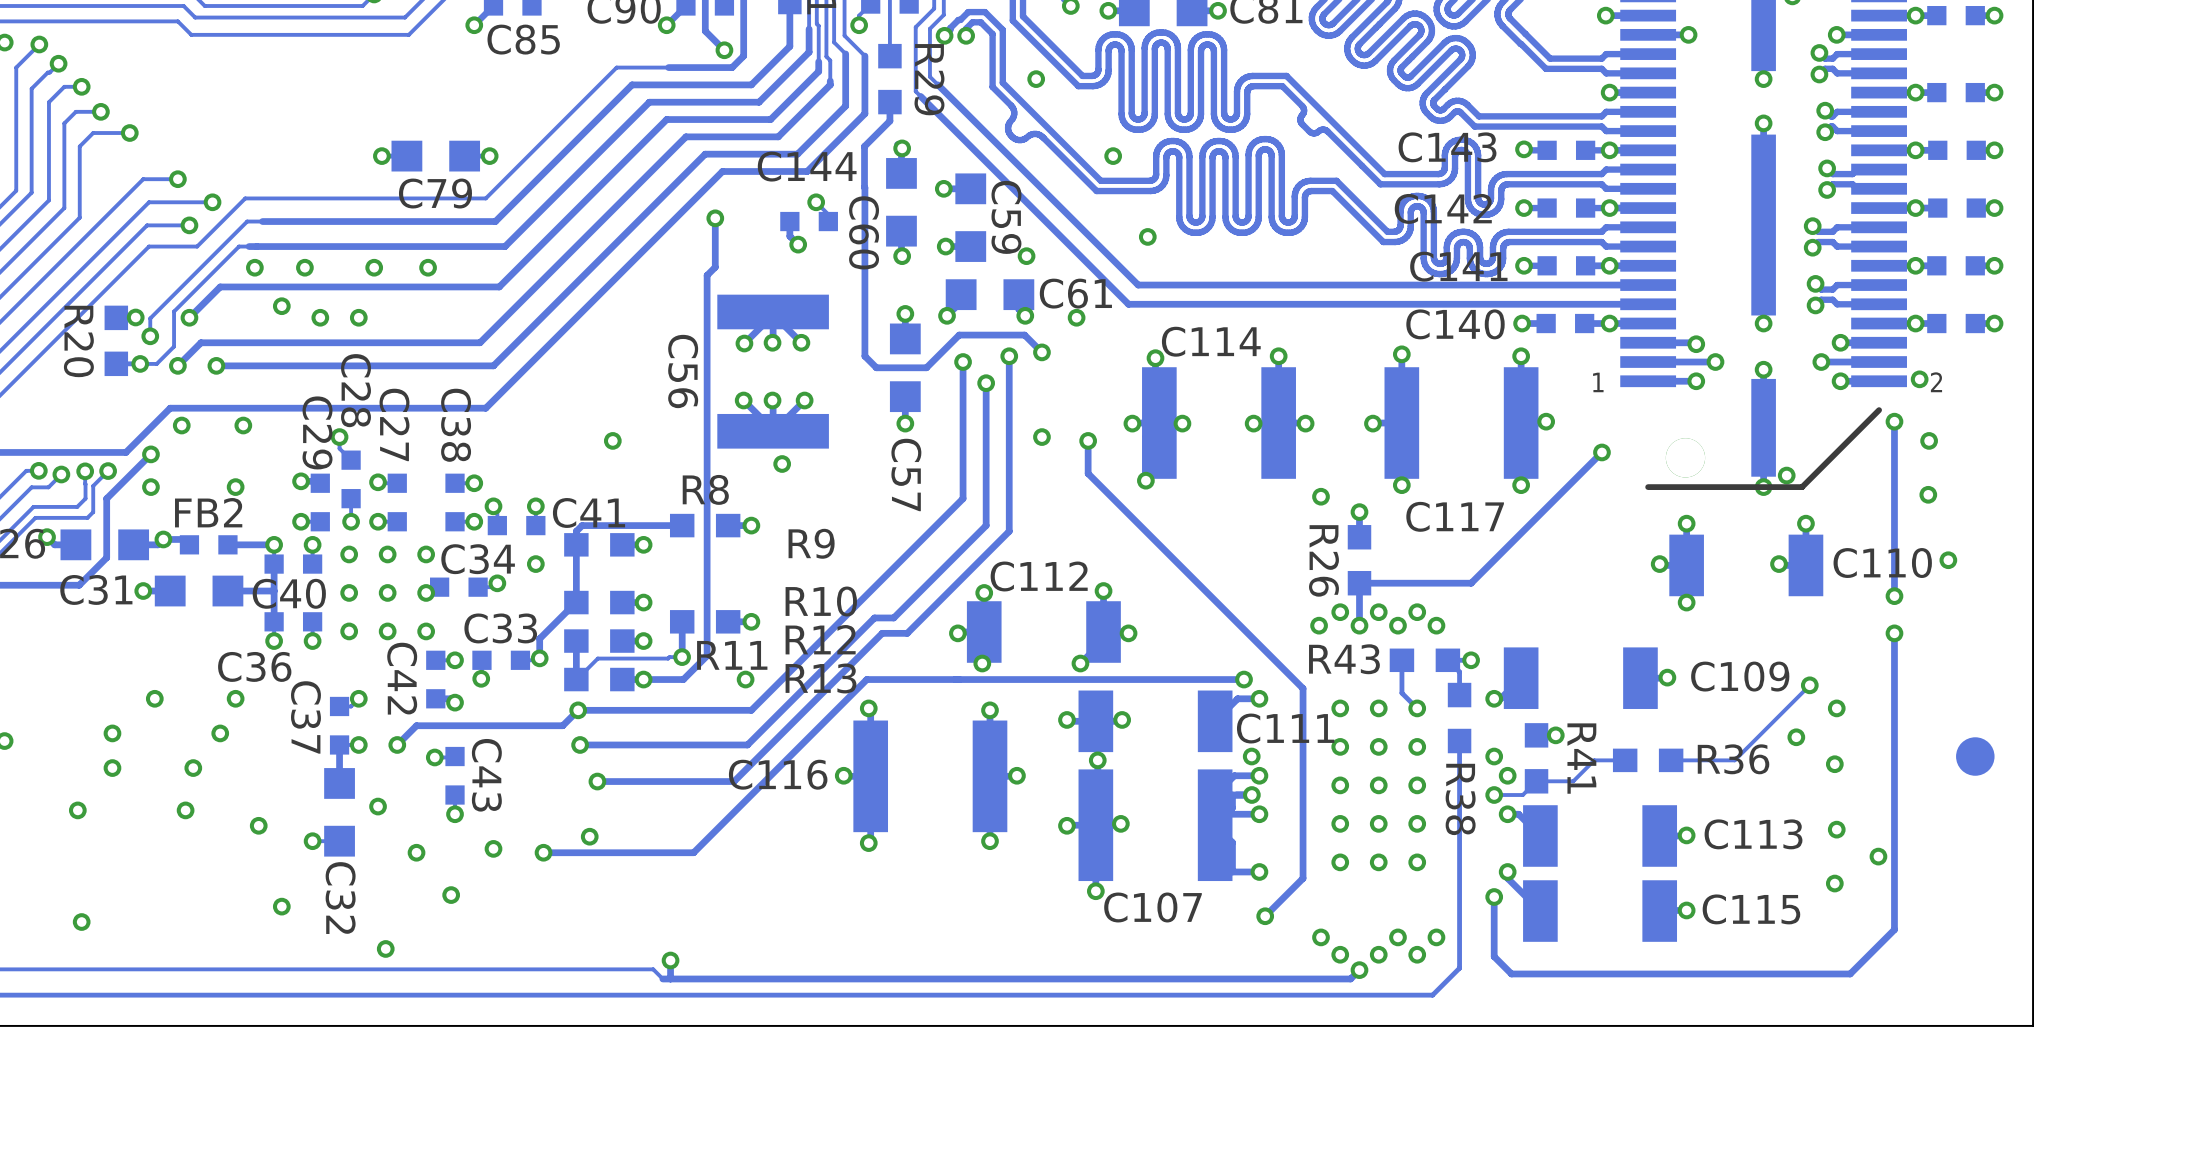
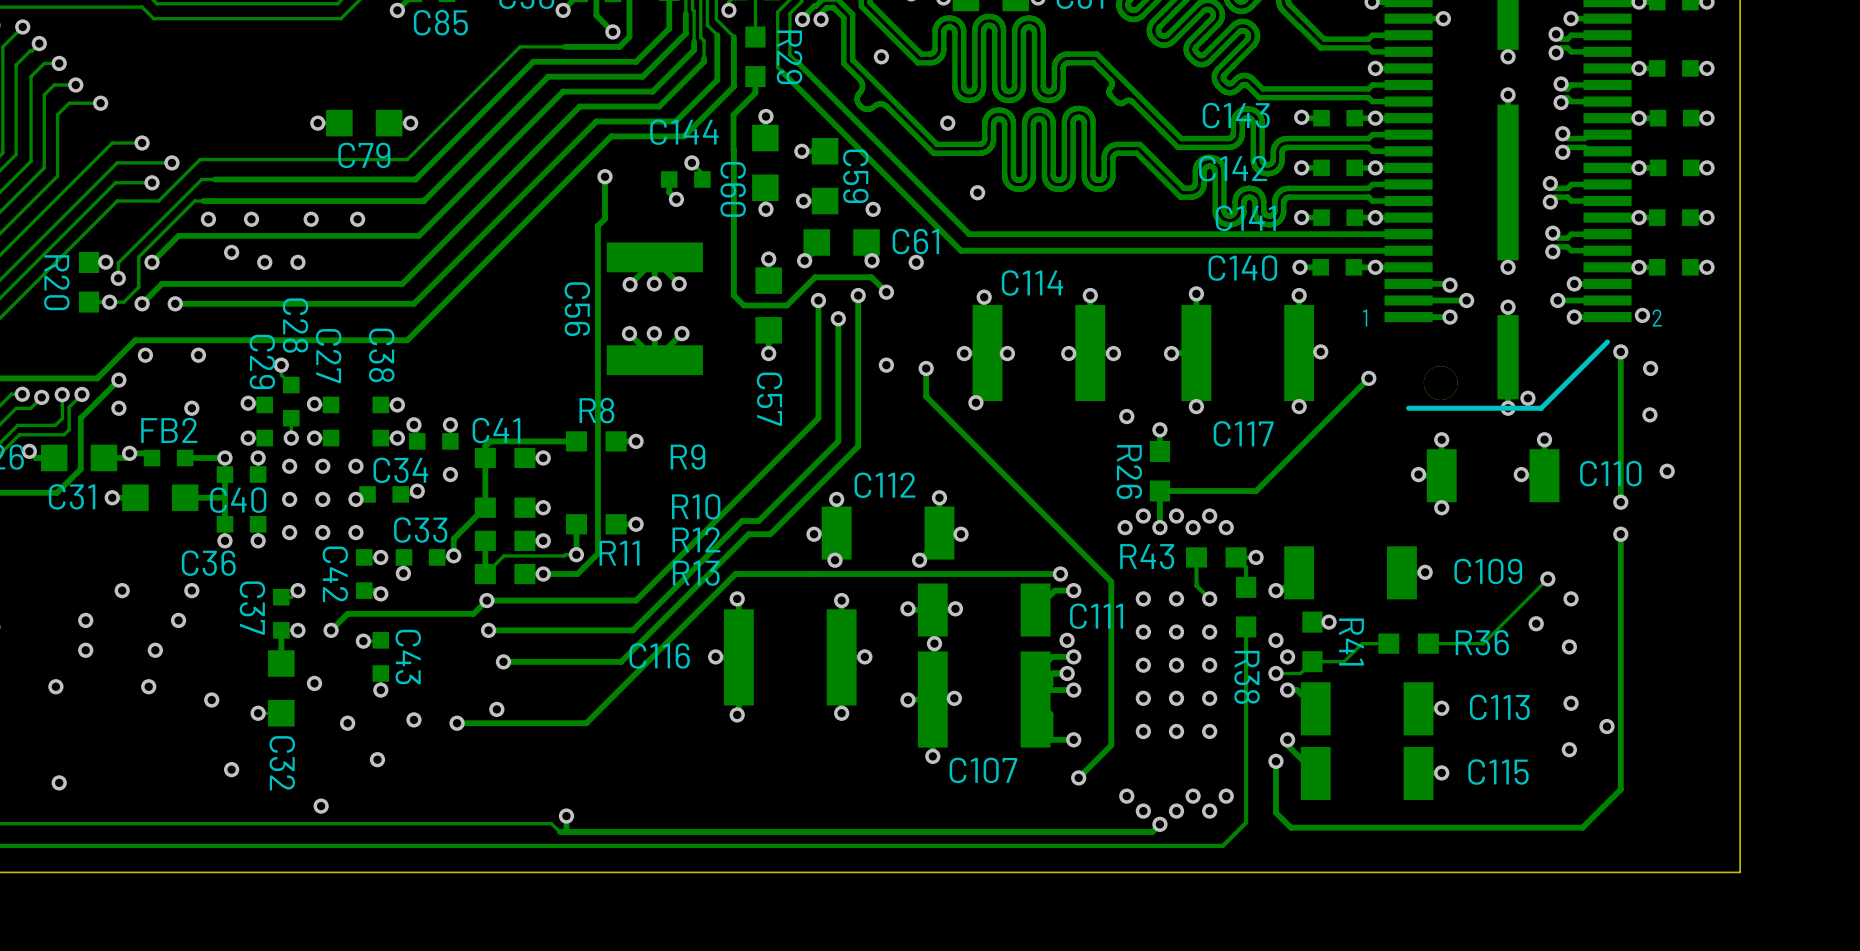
via: (612, 440) -> none
via: (782, 464) -> none
via: (745, 679) -> none
part: (1975, 756) -> none

